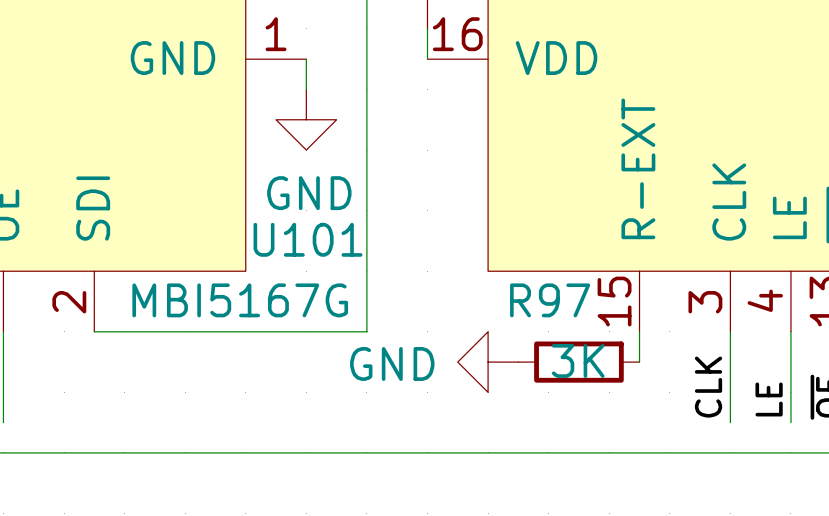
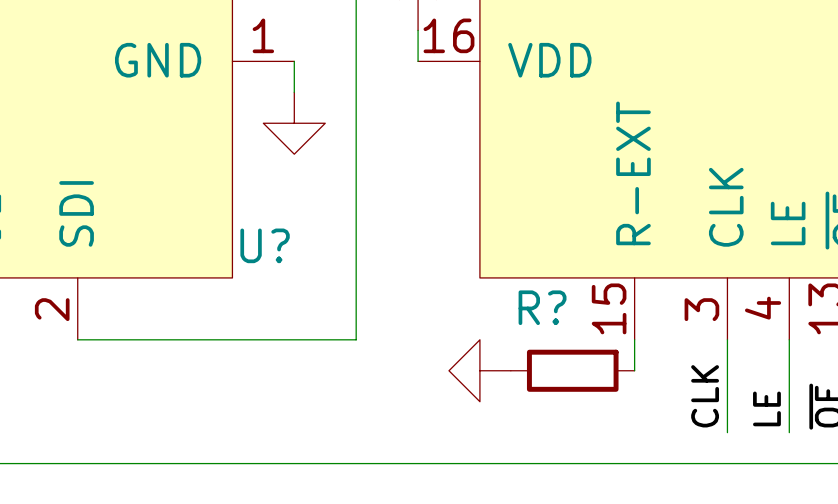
power symbol text: GND (309, 193) -> none
U101 name: U101 (308, 239) -> U? (265, 245)
U101 value: MBI5167G (240, 300) -> none
R97 name: R97 (550, 300) -> R? (542, 307)
R97 value: 3K (578, 360) -> none
power symbol text: GND (392, 363) -> none

